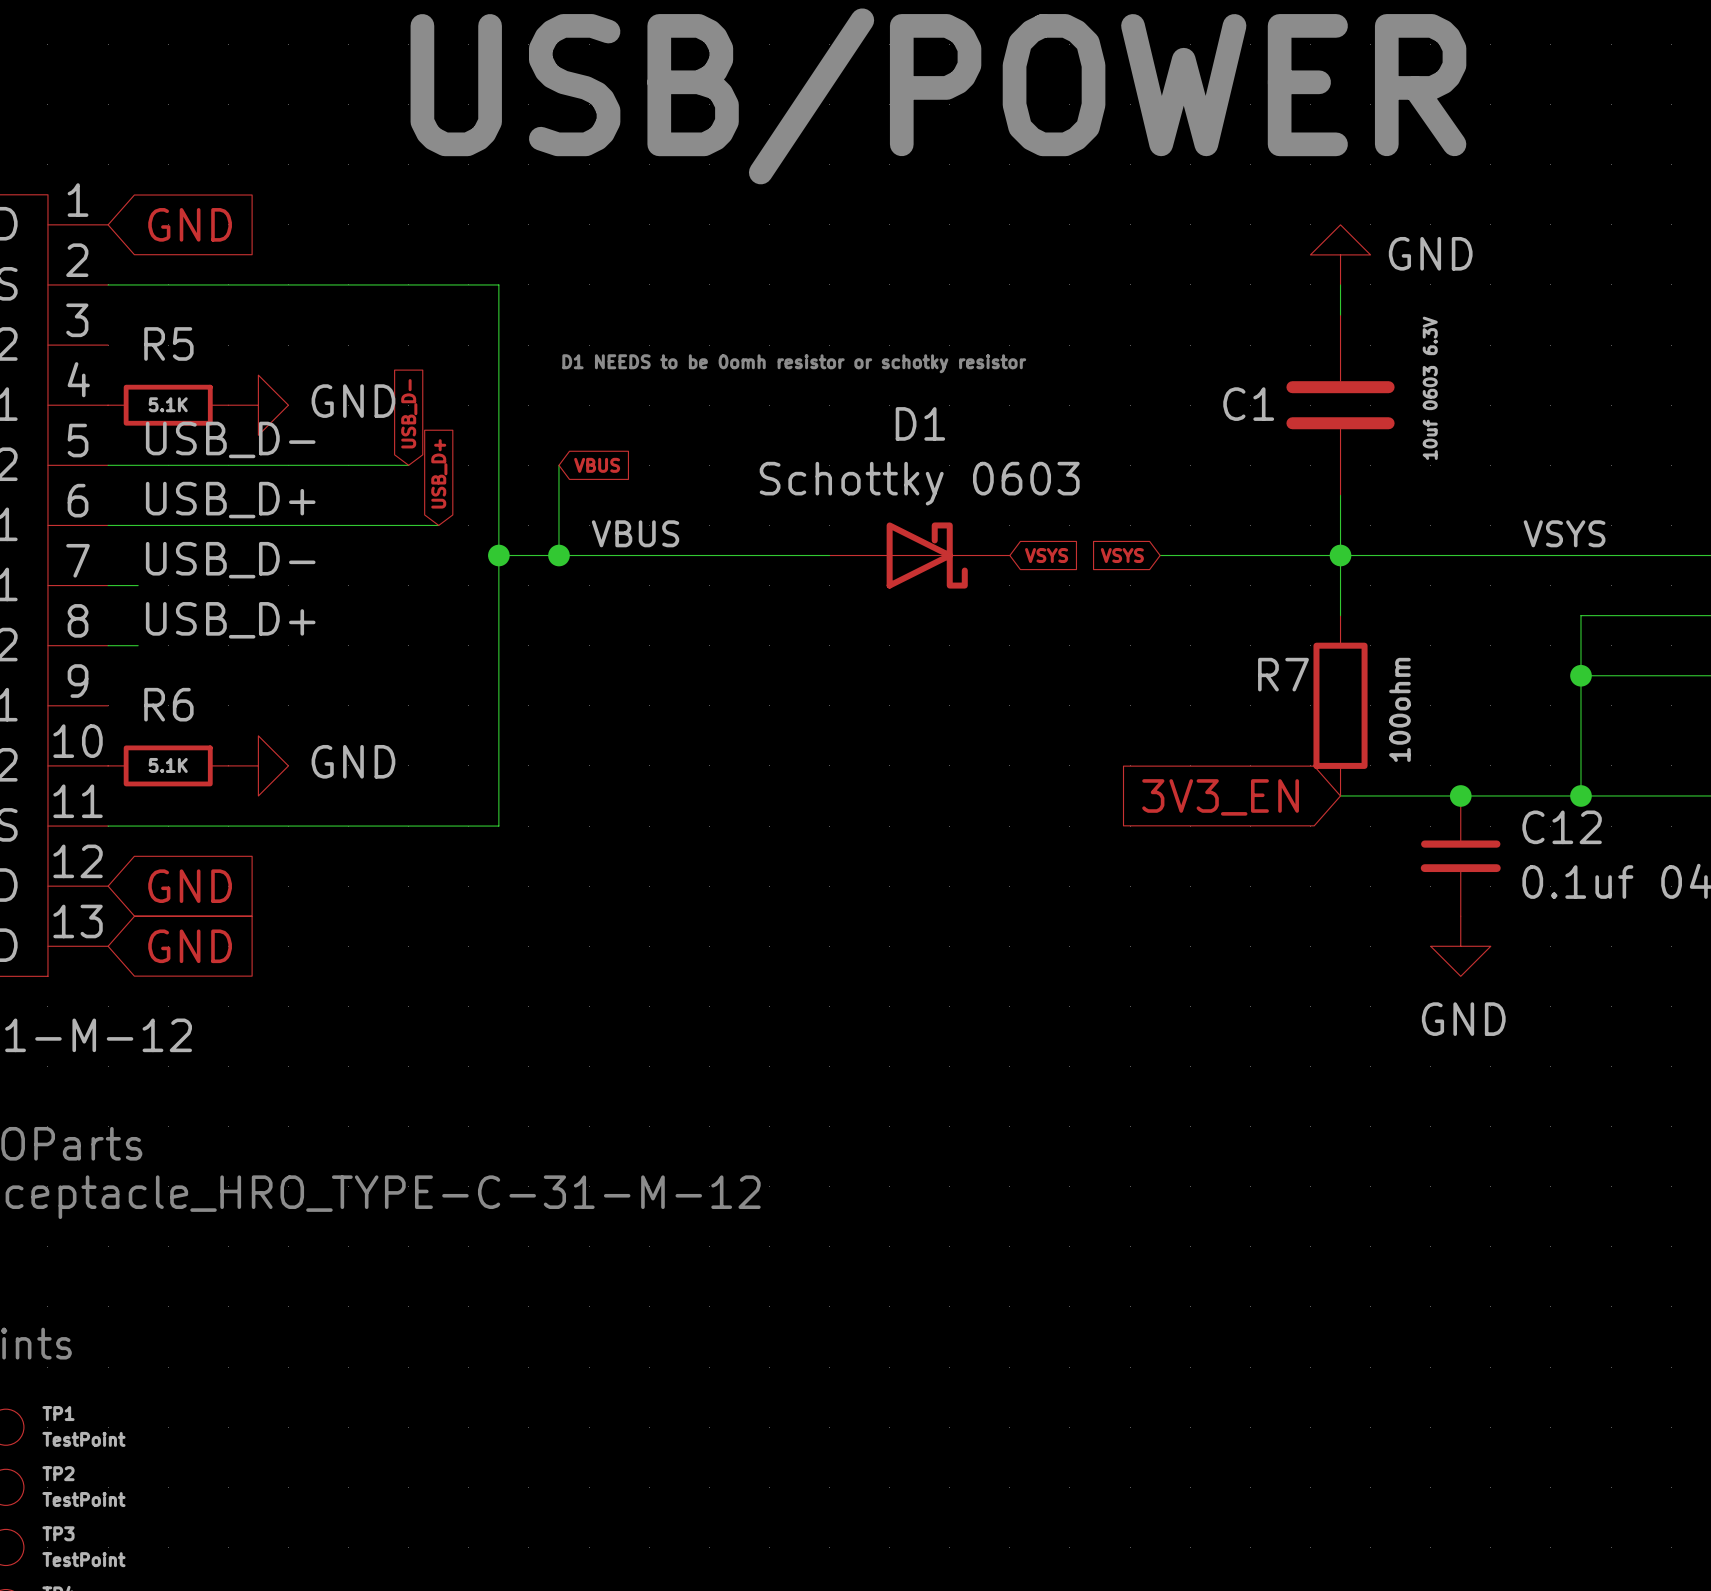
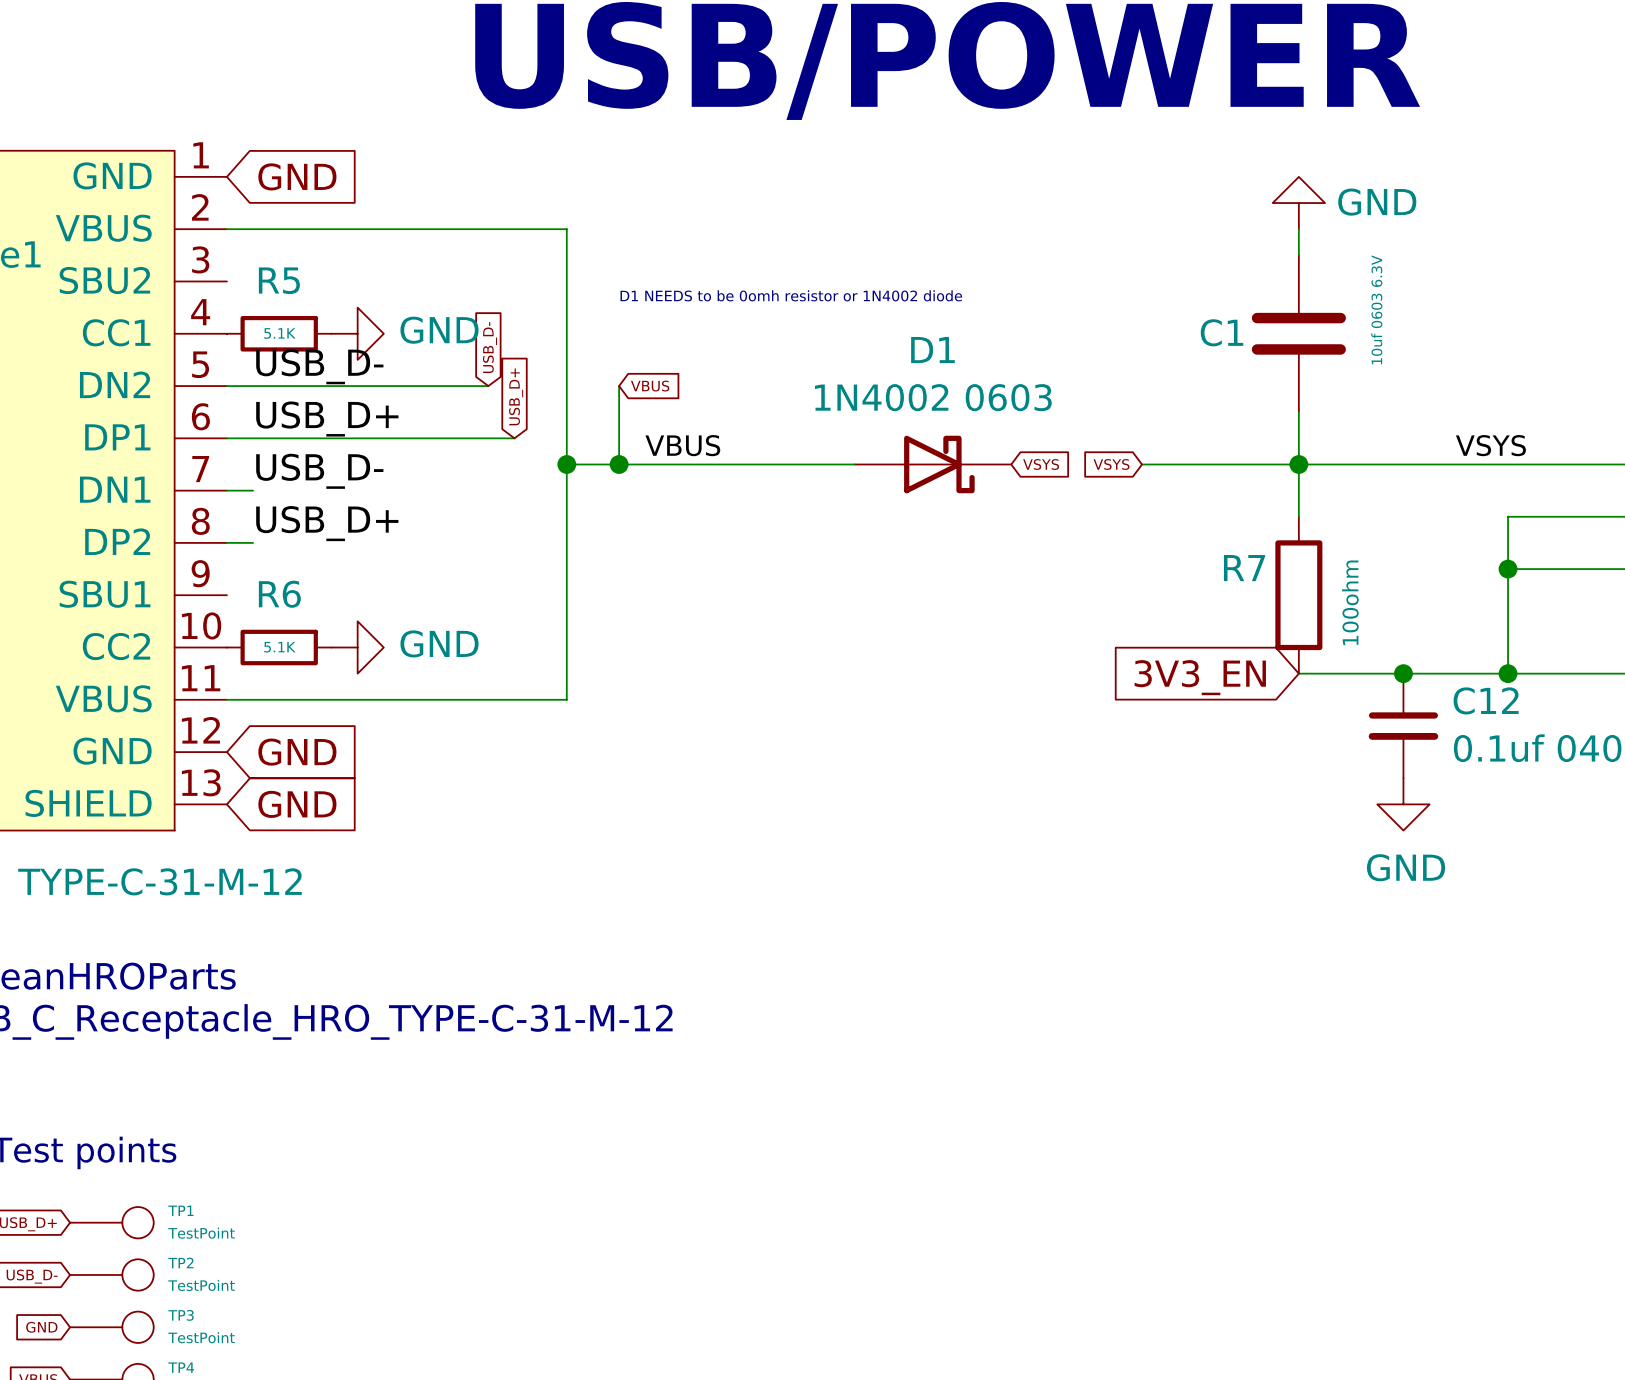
text: D1 NEEDS to be 0omh resistor or schotky resistor (794, 363) -> D1 NEEDS to be 0omh resistor or 1N4002 diode (791, 295)
D1 value: Schottky 0603 (919, 483) -> 1N4002 0603 (933, 397)

